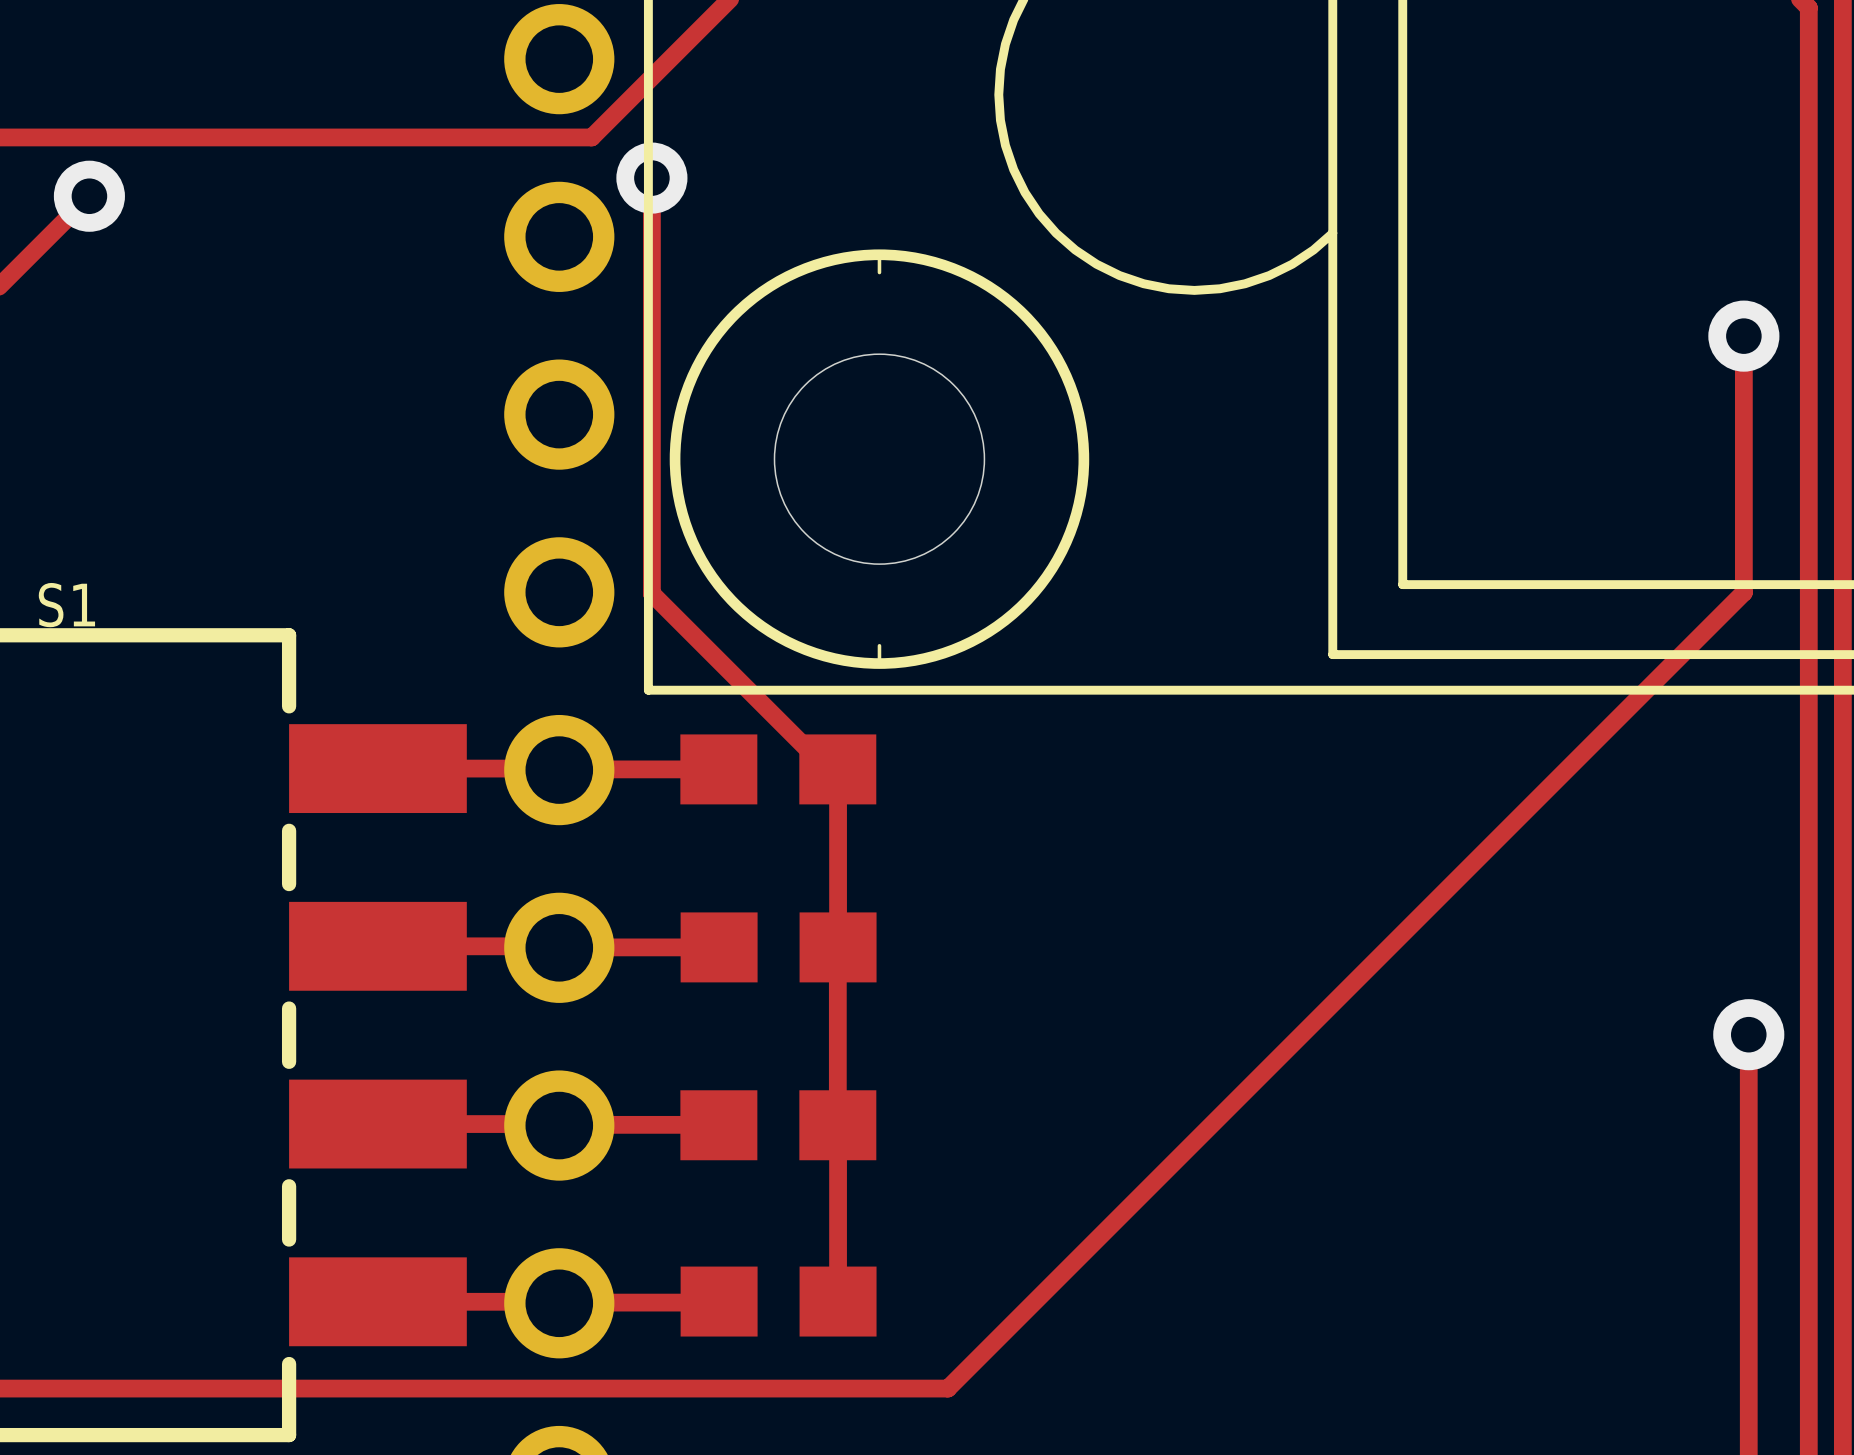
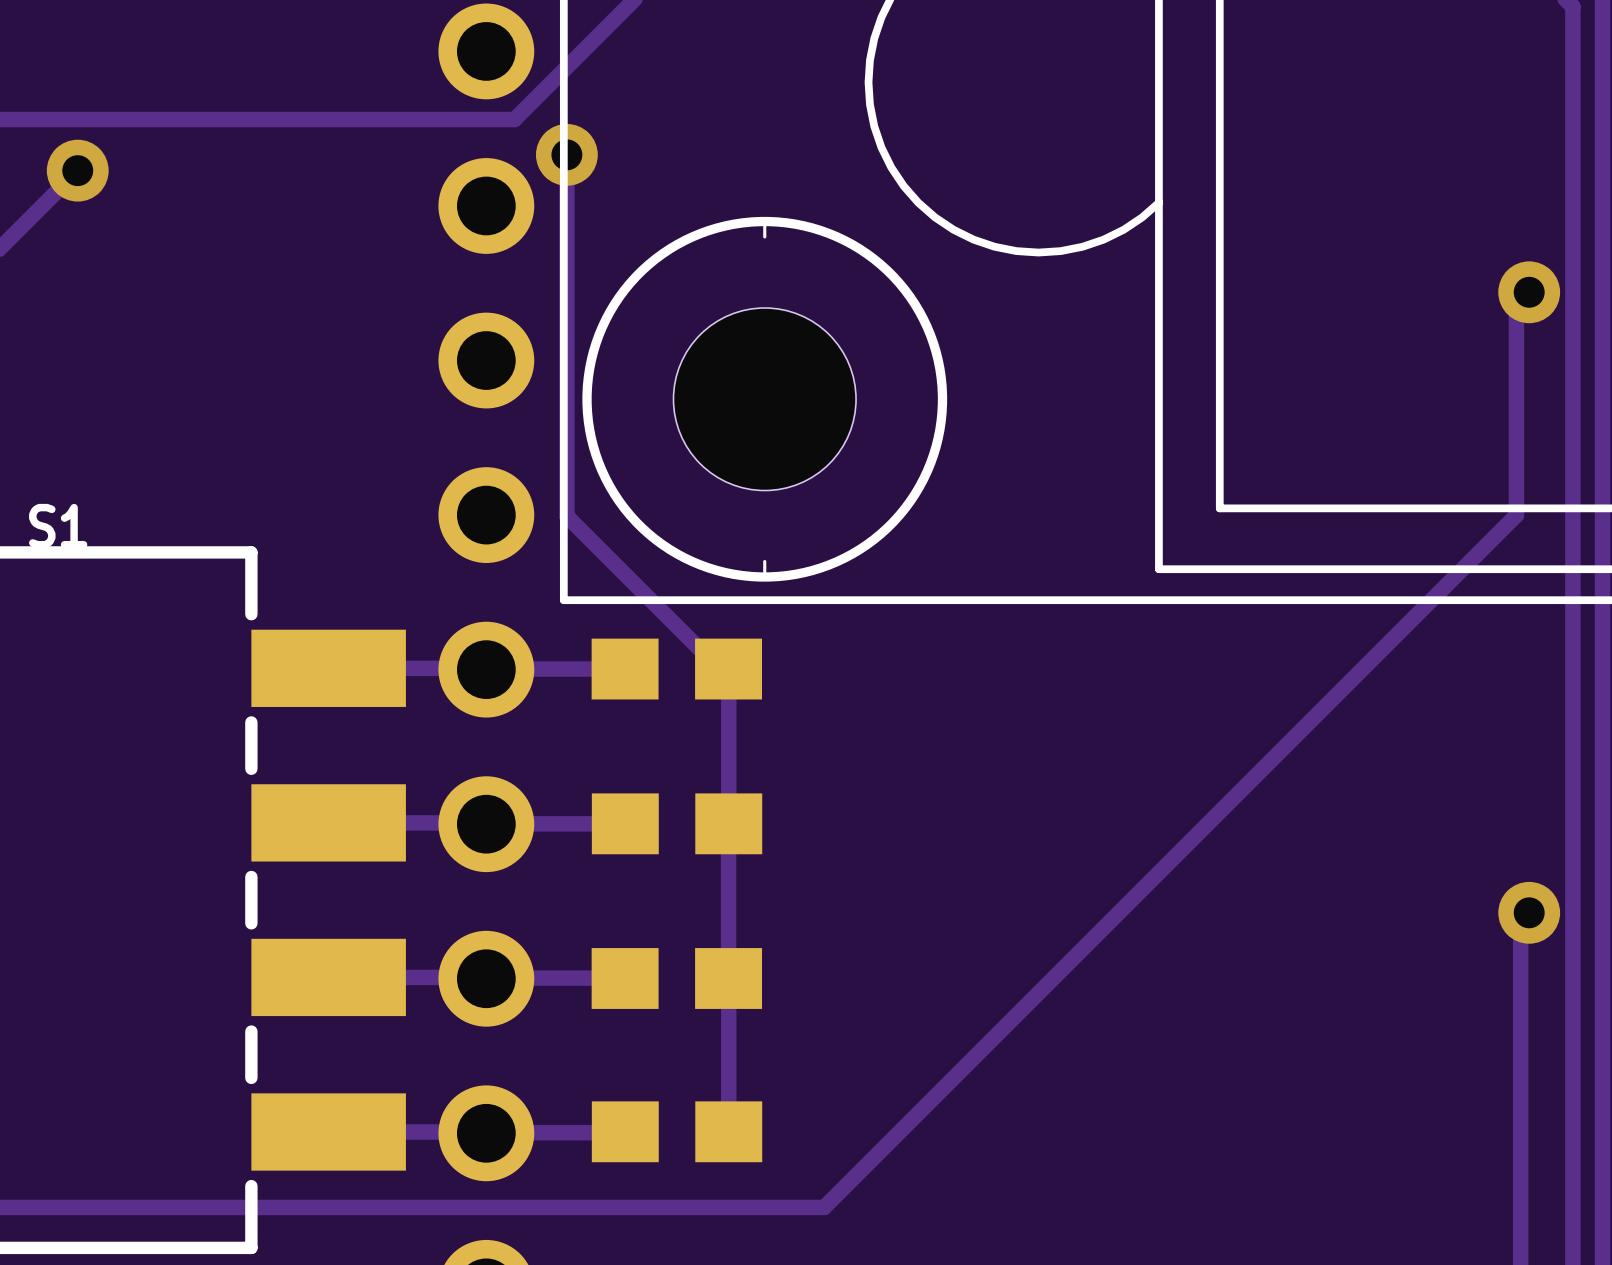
via position: (1743, 336) -> (1529, 292)
via position: (1748, 1034) -> (1529, 912)

